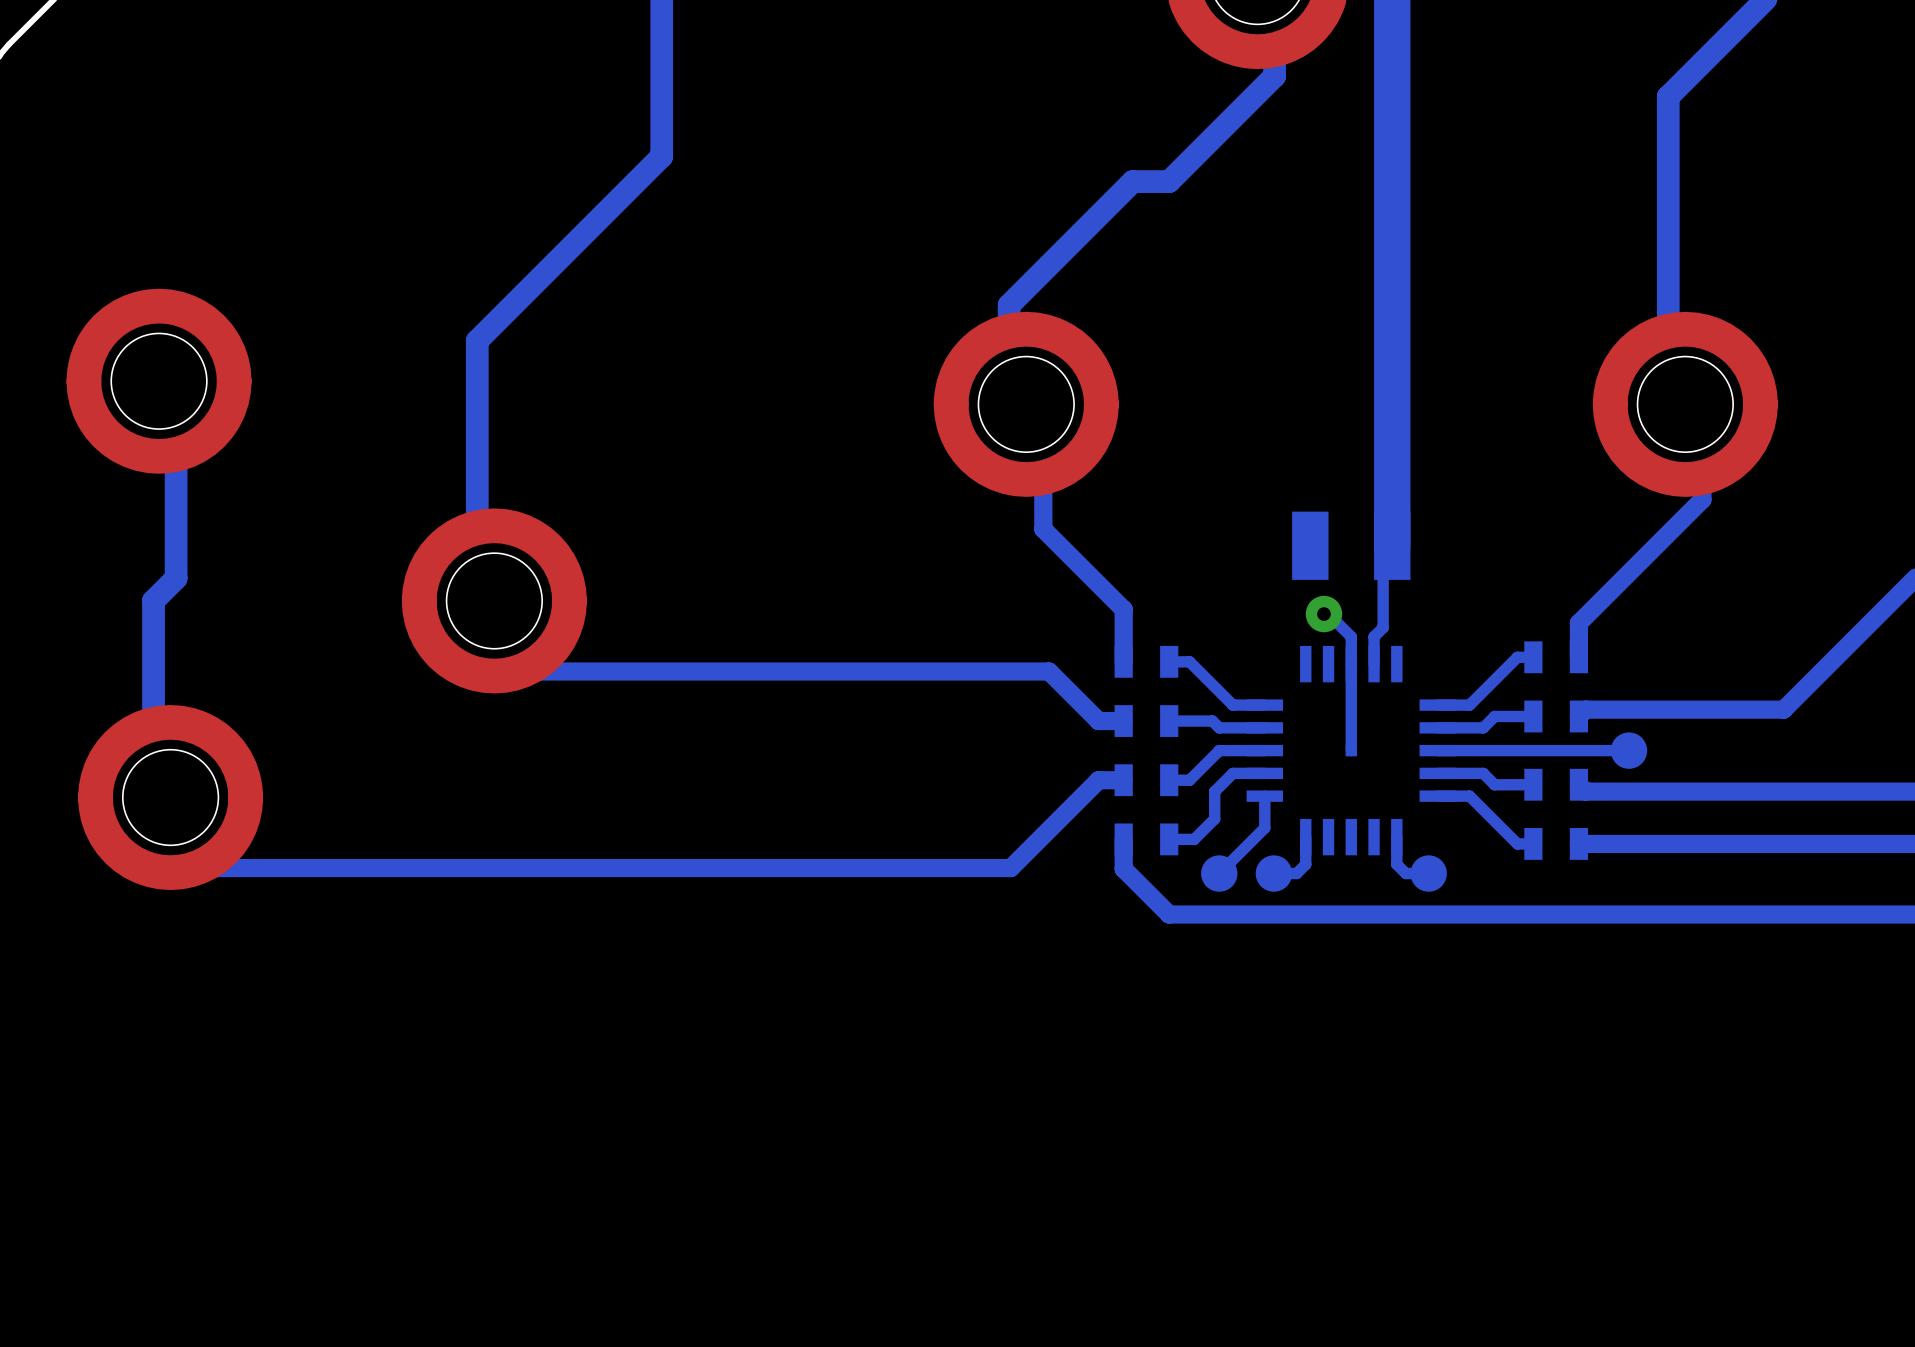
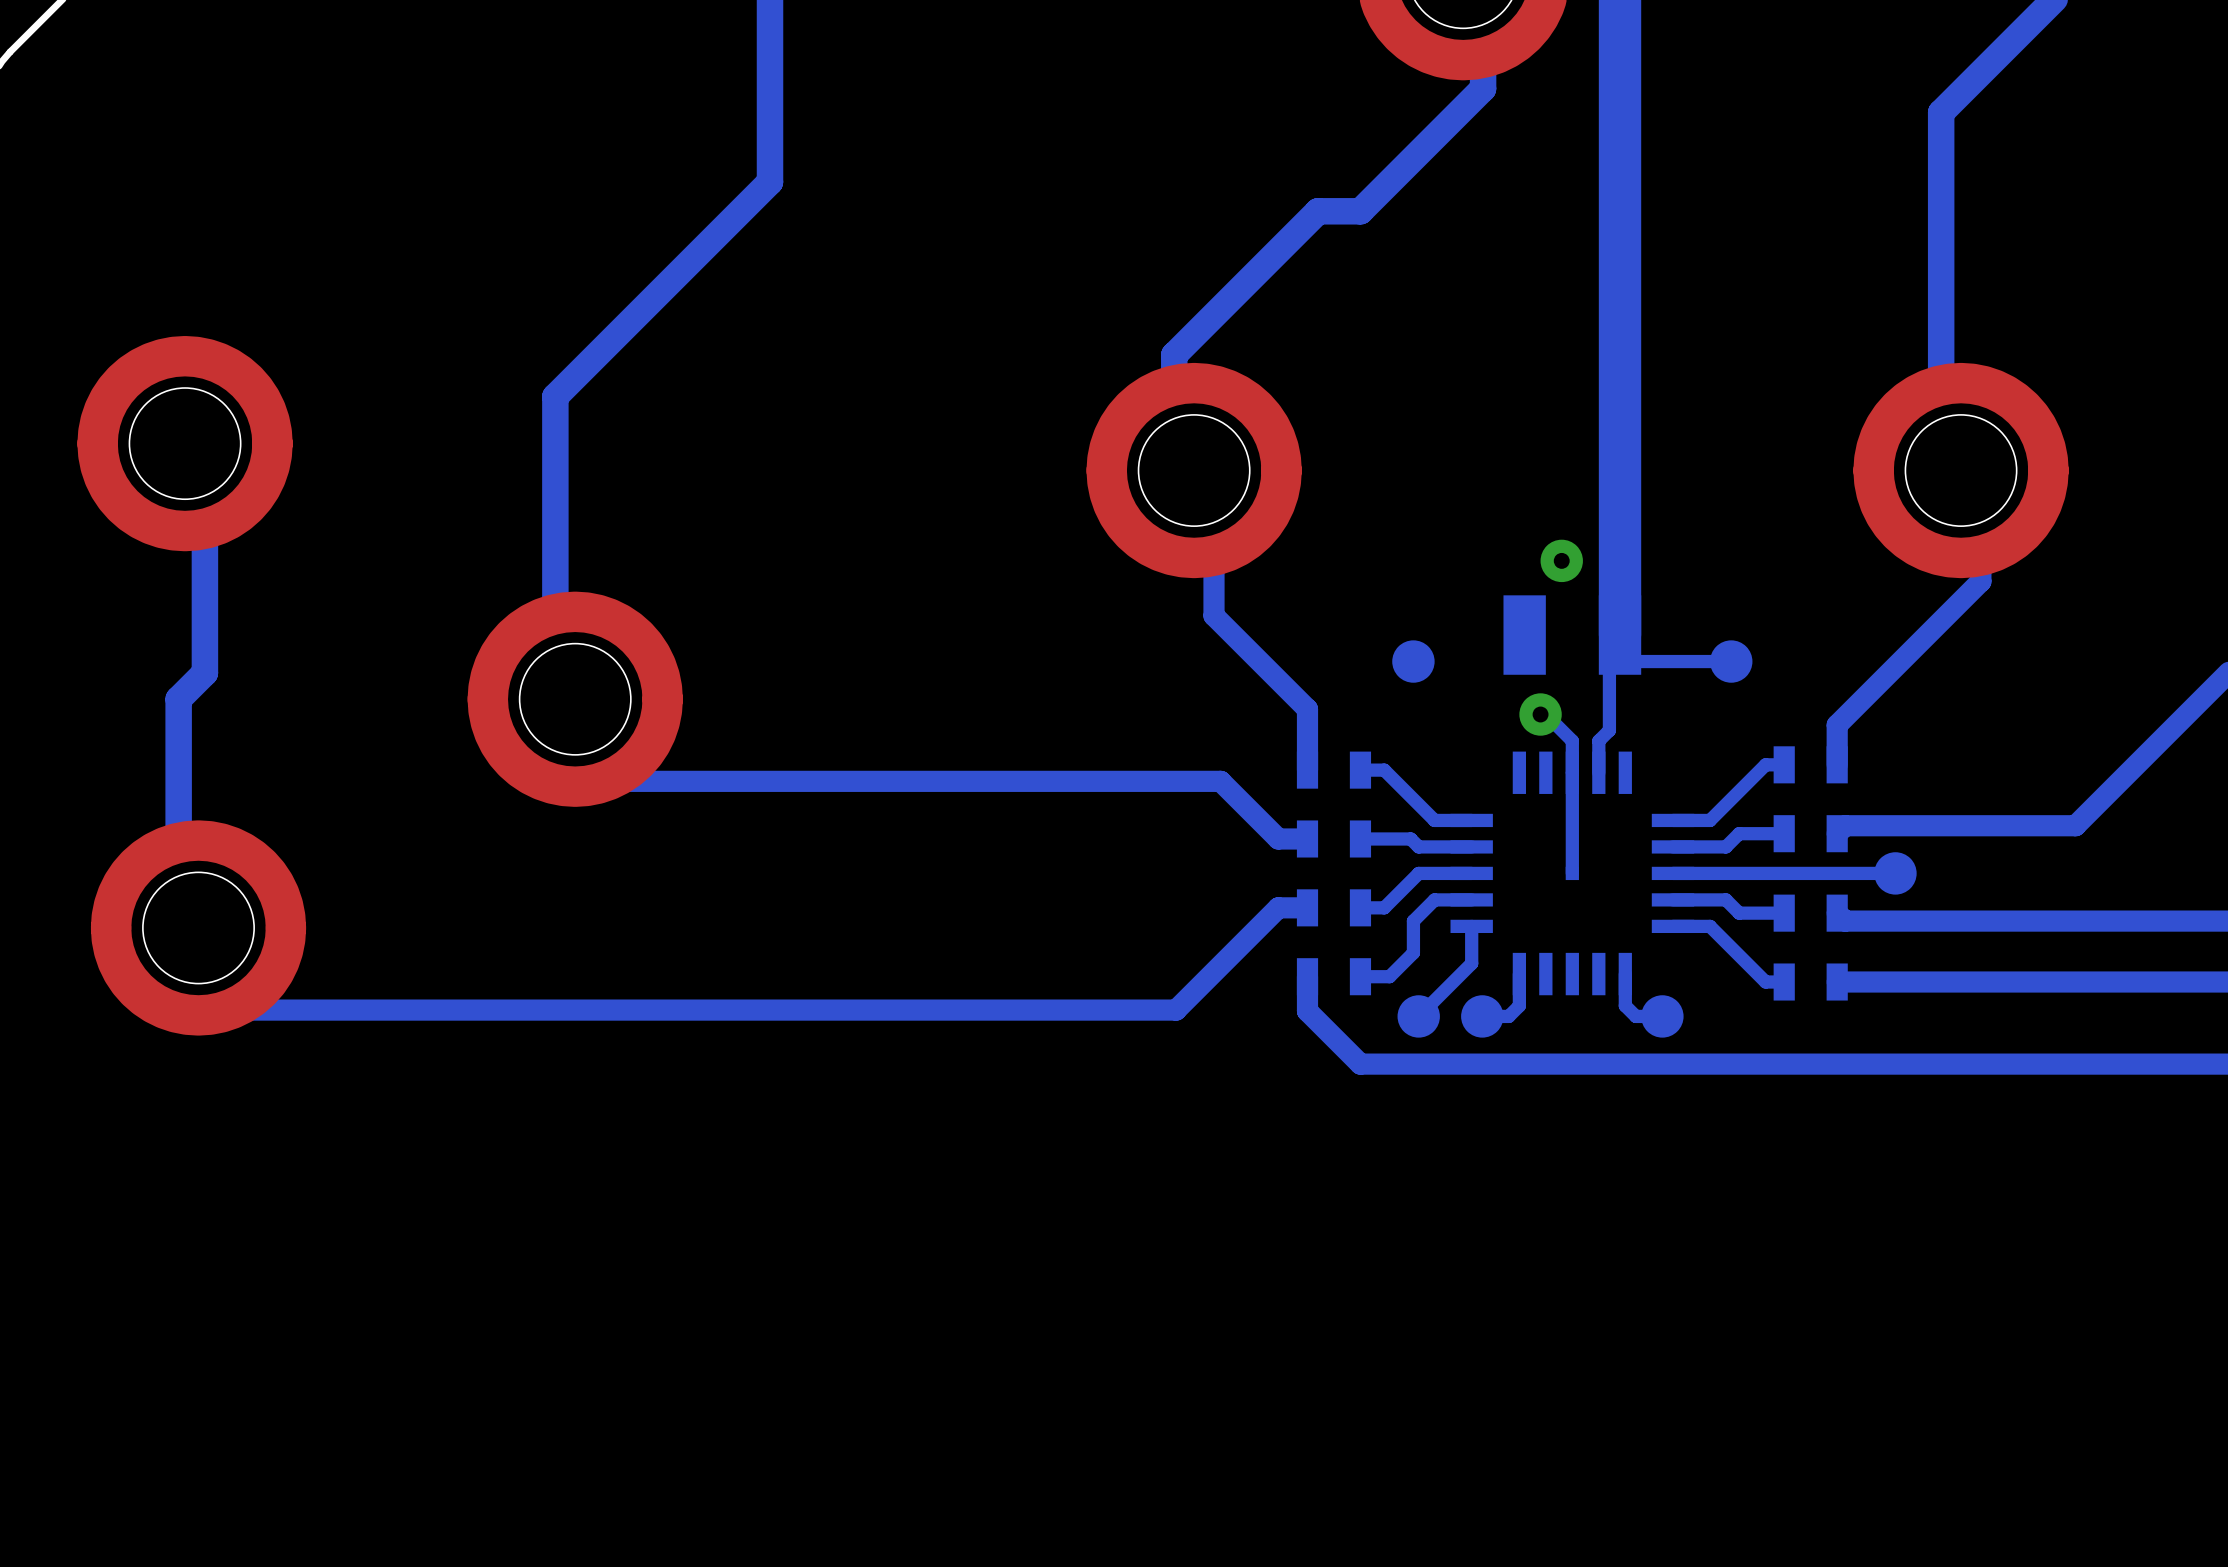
via: none -> (1561, 560)
bottom track: none -> (1620, 635) (1620, 661) (1731, 661)
part: none -> (1413, 661)
part: none -> (1731, 661)

